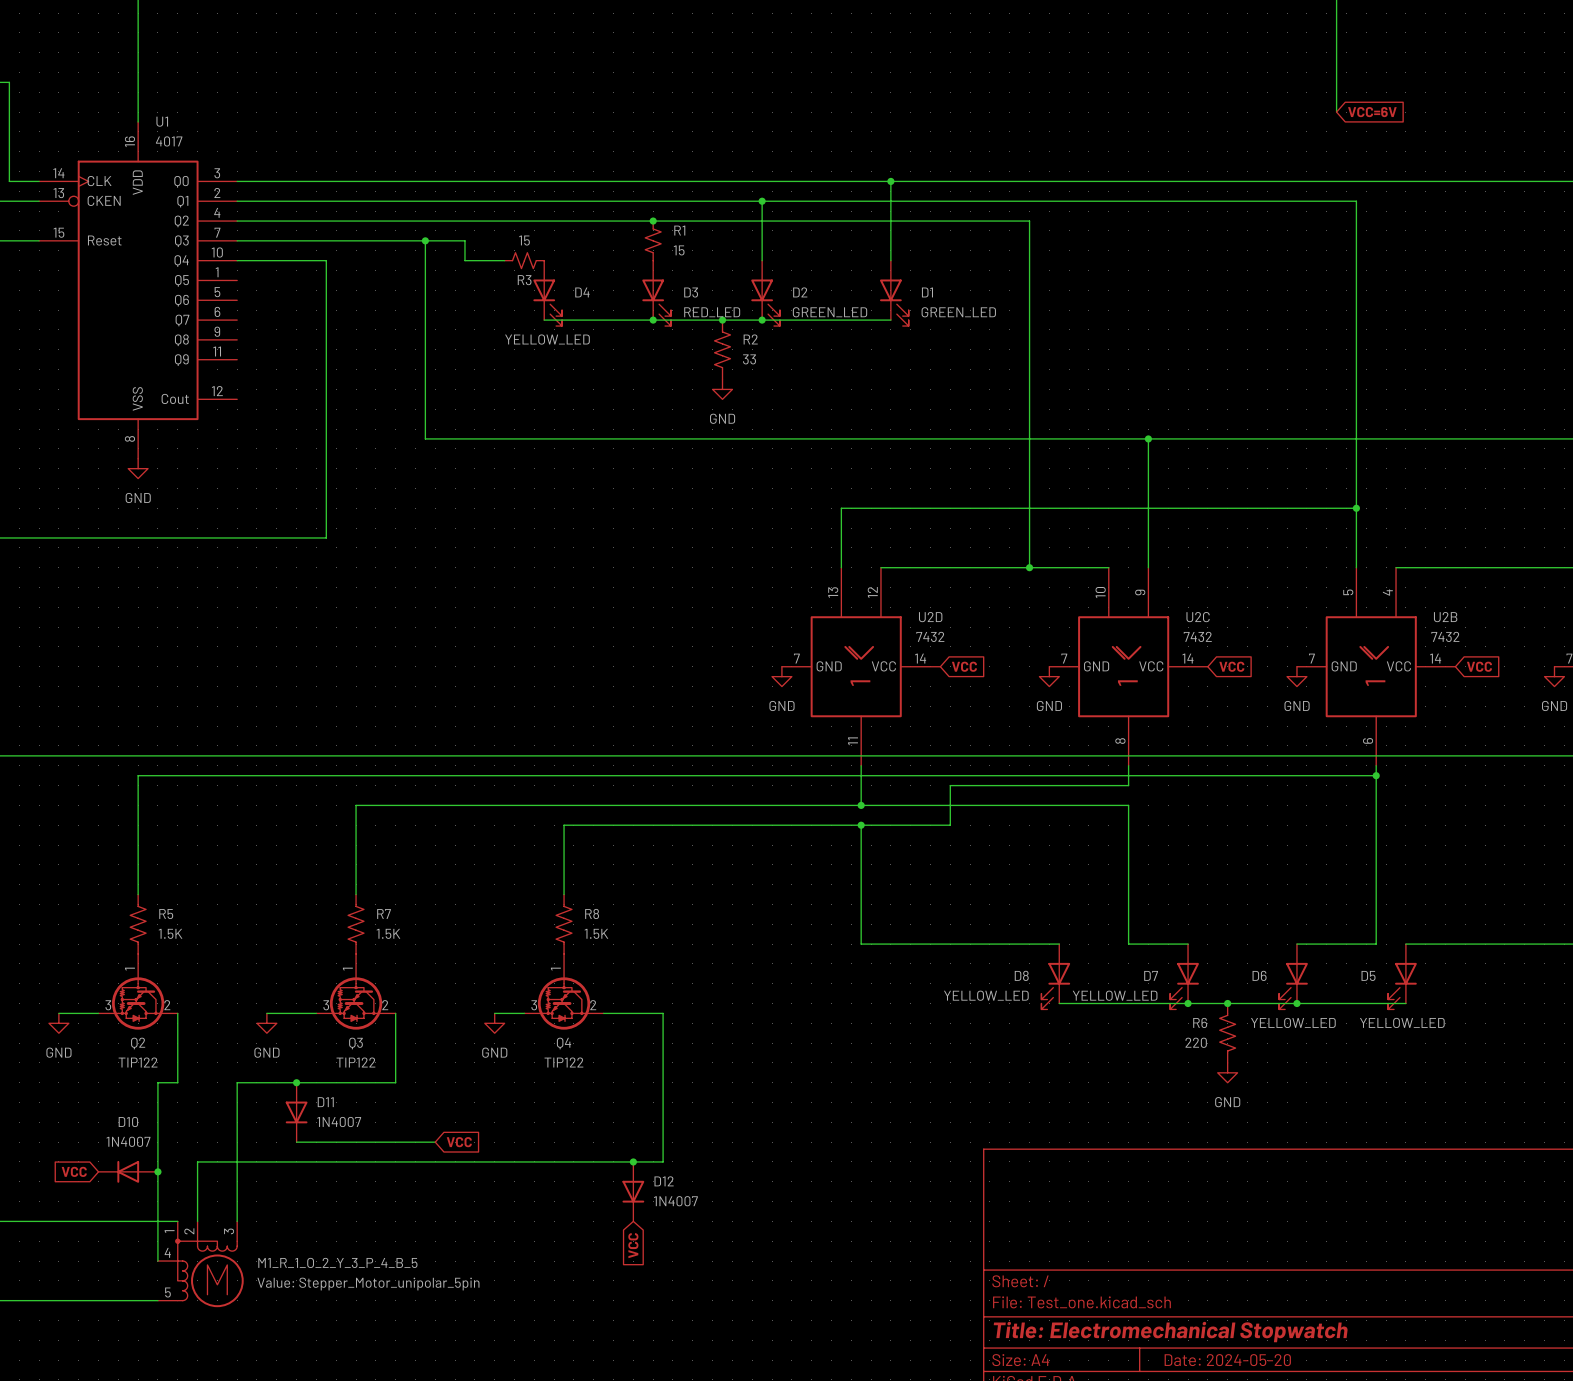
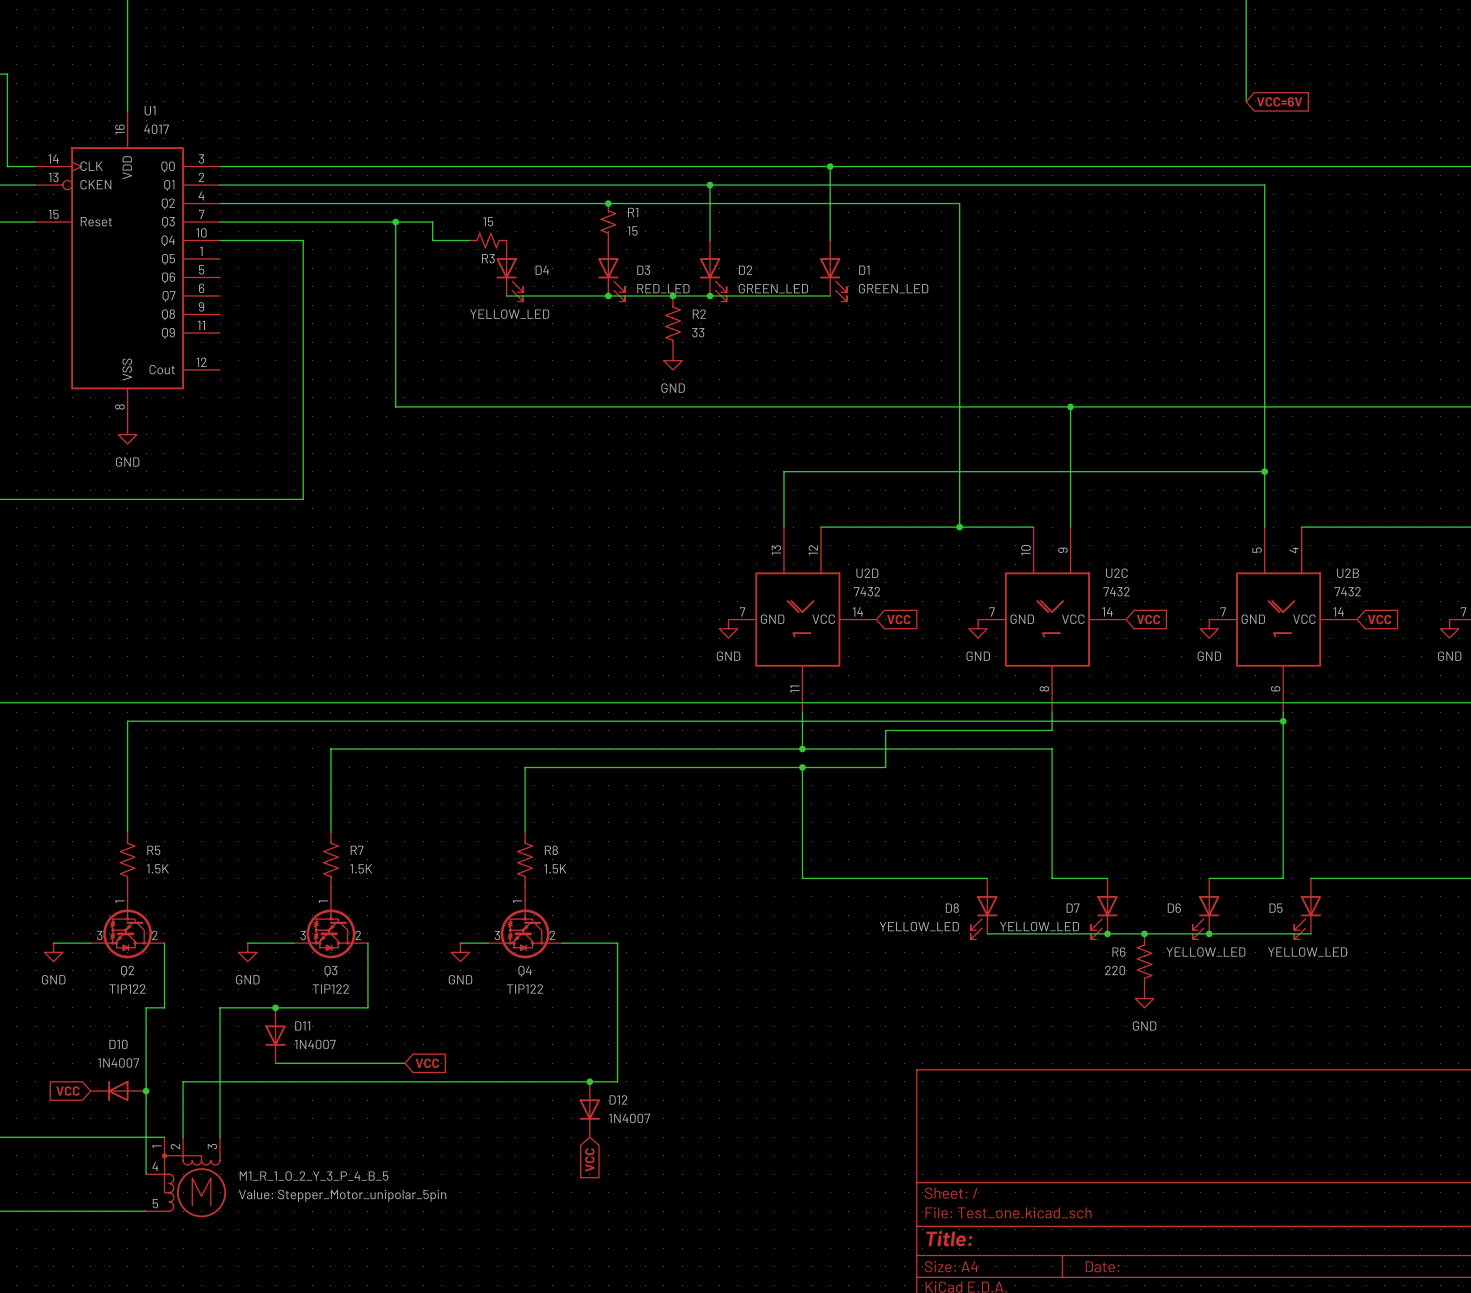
title block: Title: Electromechanical Stopwatch (1170, 1332) -> Title: (949, 1238)
title block: Date: 2024-05-20 (1227, 1360) -> Date: (1102, 1266)

